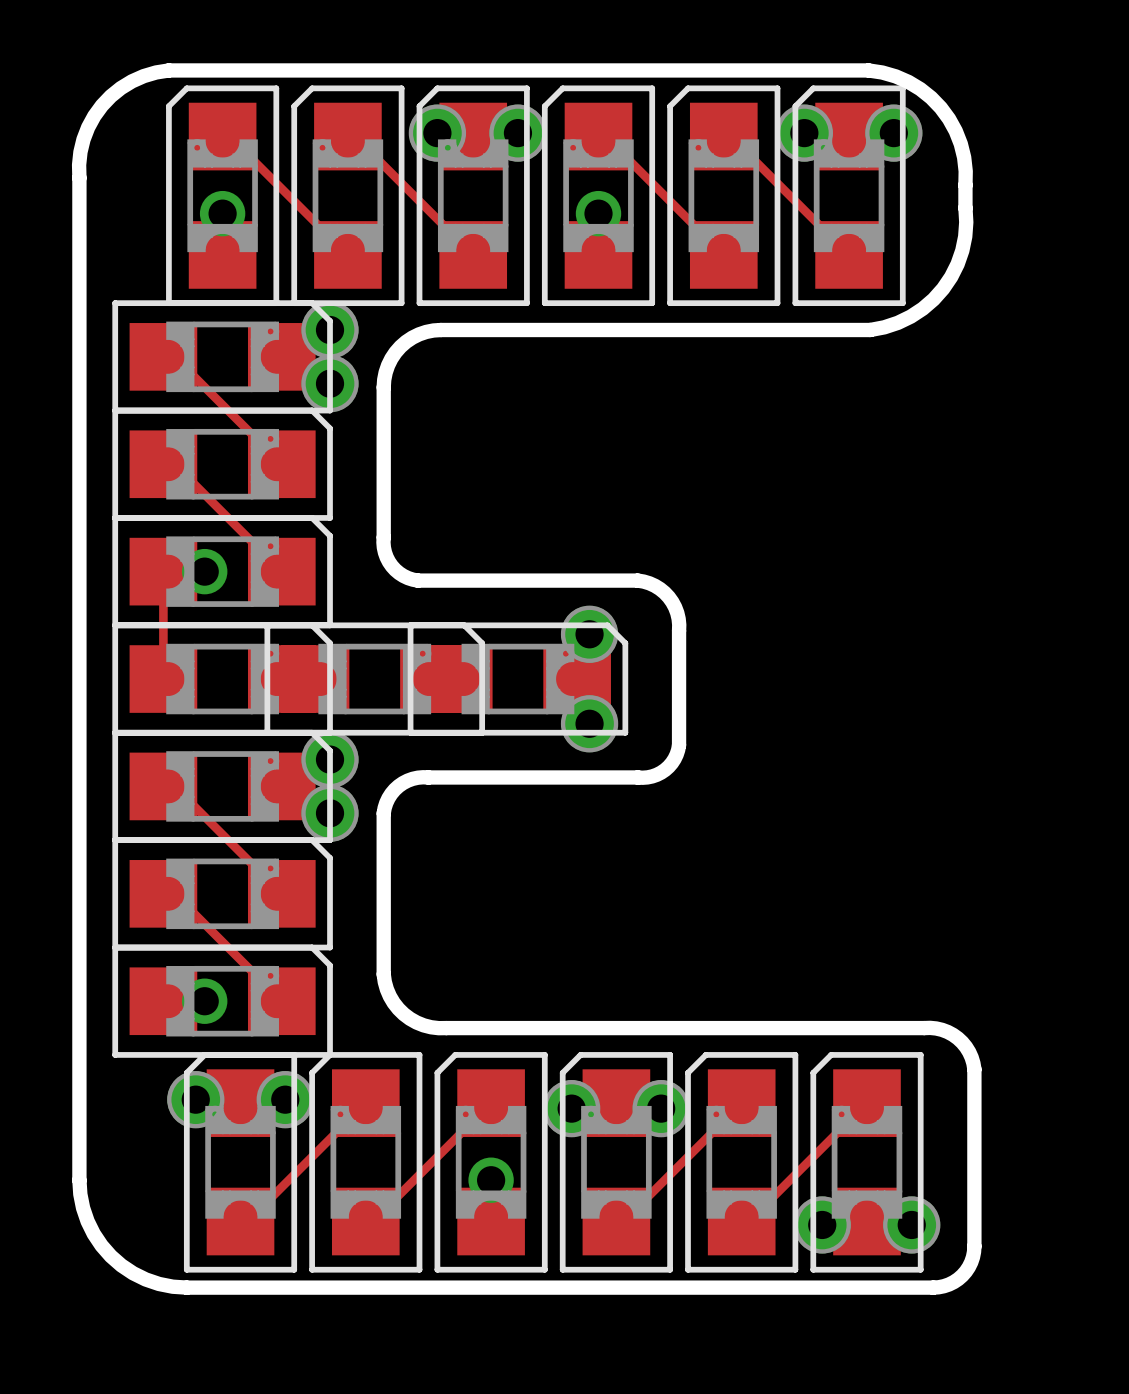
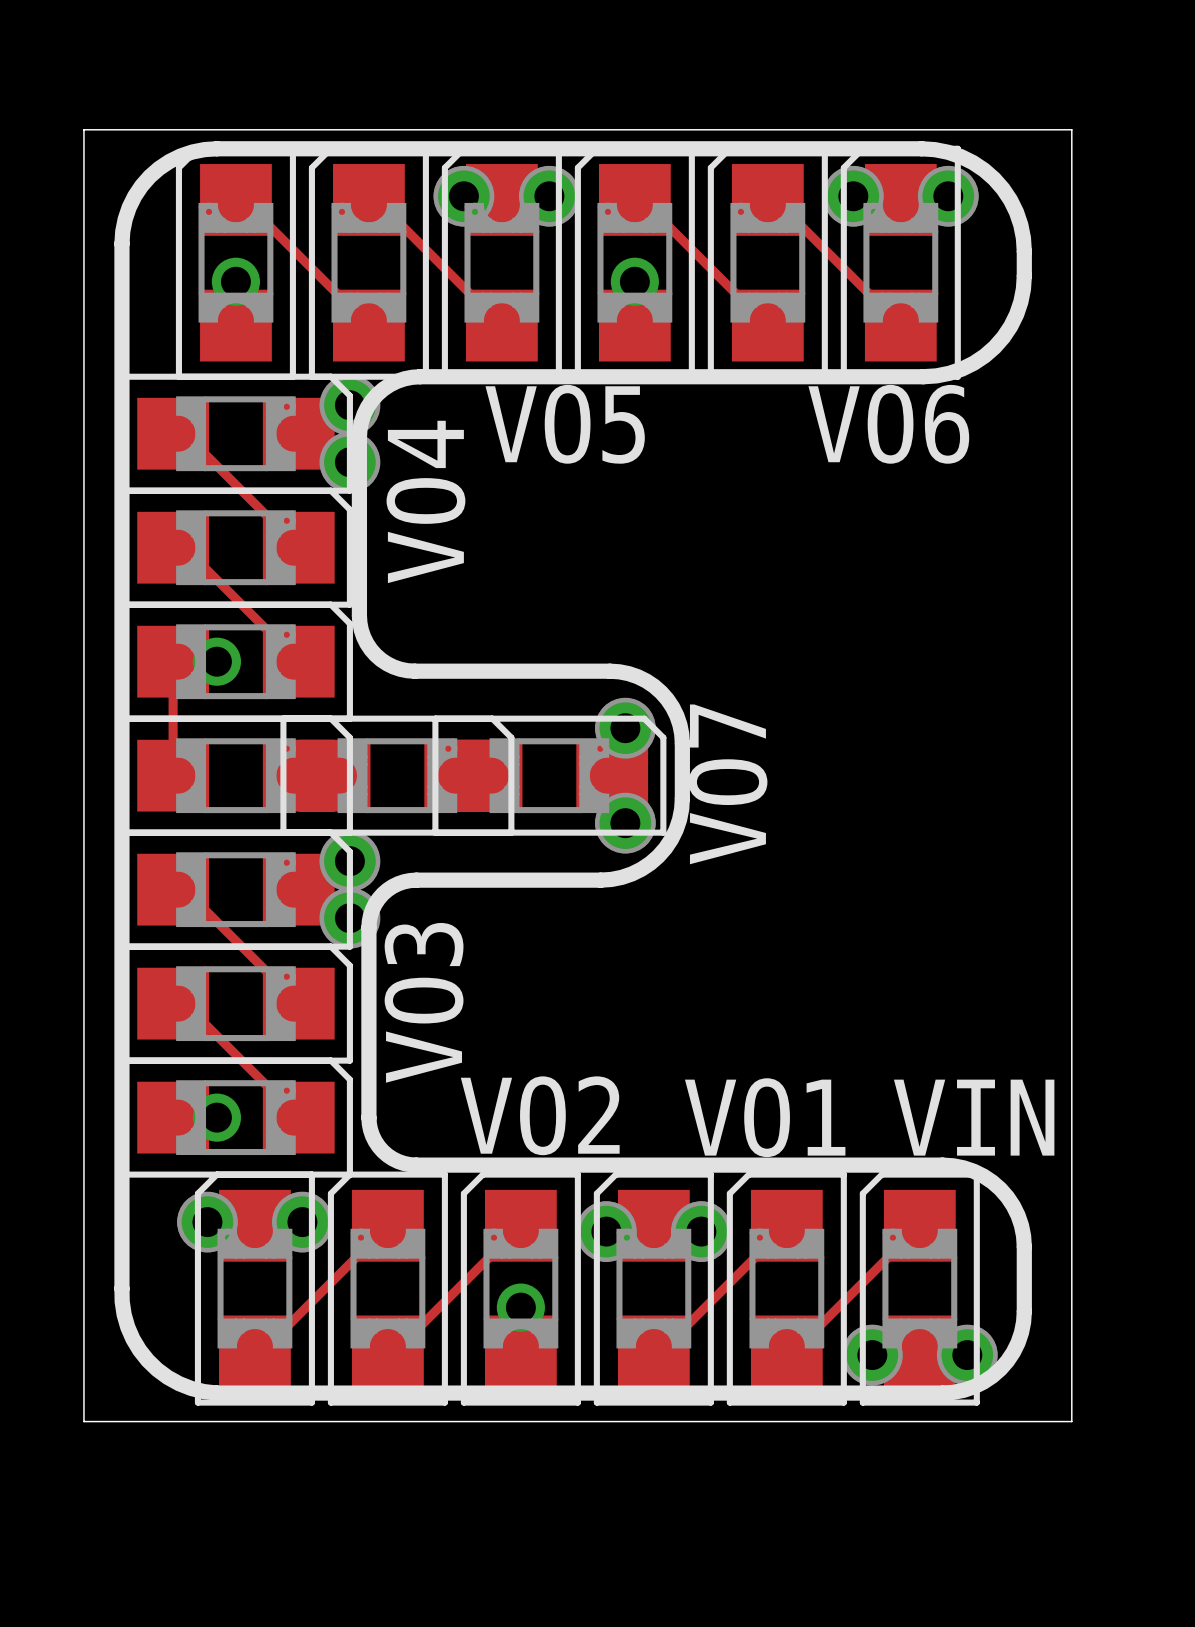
board edge: (168, 70) (143, 76) (131, 81) (120, 88) (101, 105) (94, 116) (83, 139) (80, 152) (79, 177) -> (178, 129) (83, 129) (83, 243)
board edge width: thick (168, 70) (868, 70) -> thin (178, 129) (921, 129)
board edge: (868, 70) (895, 76) (908, 81) (931, 97) (940, 107) (955, 131) (964, 157) (966, 222) (962, 250) (951, 276) (943, 288) (933, 299) (910, 316) (897, 322) (870, 330) (433, 330) (412, 337) (400, 346) (391, 358) (385, 372) (383, 387) (383, 542) (386, 557) (391, 566) (403, 575) (417, 580) (637, 580) (649, 583) (660, 588) (672, 602) (678, 618) (679, 745) (674, 758) (668, 766) (656, 774) (647, 777) (423, 777) (407, 780) (398, 786) (388, 798) (383, 813) (383, 974) (389, 996) (398, 1008) (416, 1022) (438, 1028) (930, 1027) (942, 1029) (952, 1034) (962, 1042) (969, 1052) (974, 1069) (974, 1251) (968, 1267) (958, 1279) (948, 1284) (933, 1287) -> (921, 129) (1071, 129) (1071, 1421) (990, 1421)
line: none -> (216, 148) (921, 148) (948, 152) (972, 162) (994, 178) (1010, 200) (1016, 212) (1023, 238) (1024, 275) (1020, 301) (1016, 314) (1003, 337) (984, 355) (961, 369) (936, 375) (923, 376) (412, 377) (396, 381) (377, 394) (364, 414) (359, 437) (359, 623) (363, 637) (375, 654) (393, 666) (407, 670) (610, 671) (628, 673) (646, 680) (667, 699) (679, 724) (682, 743) (682, 798) (679, 819) (665, 848) (641, 869) (621, 877) (600, 880) (410, 880) (392, 886) (378, 898) (370, 915) (368, 927) (368, 1117) (370, 1129) (375, 1141) (382, 1151) (392, 1158) (404, 1163) (416, 1165) (942, 1165) (973, 1171) (1000, 1189) (1013, 1205) (1021, 1225) (1024, 1246) (1024, 1311) (1021, 1332) (1007, 1361) (983, 1382) (963, 1390) (942, 1393) (216, 1393) (203, 1391) (179, 1383) (157, 1369) (139, 1350) (127, 1327) (122, 1301) (121, 1288) (121, 243) (125, 219) (129, 207) (141, 185) (149, 176) (159, 168) (180, 156) (192, 152) (216, 148)
board edge width: thick (79, 177) (79, 1180) -> thin (83, 243) (83, 1307)
VO5 name: none -> VO5 (565, 424)
VO6 name: none -> VO6 (888, 424)
VO4 name: none -> VO4 (425, 501)
VO7 name: none -> VO7 (728, 784)
VO3 name: none -> VO3 (424, 1002)
VO2 name: none -> VO2 (540, 1115)
VO1 name: none -> VO1 (765, 1117)
VIN name: none -> VIN (974, 1117)
board edge: (79, 1180) (83, 1208) (87, 1221) (93, 1233) (110, 1256) (133, 1273) (145, 1279) (159, 1283) (186, 1287) -> (83, 1307) (83, 1421) (197, 1421)
board edge width: thick (186, 1287) (933, 1287) -> thin (197, 1421) (990, 1421)

